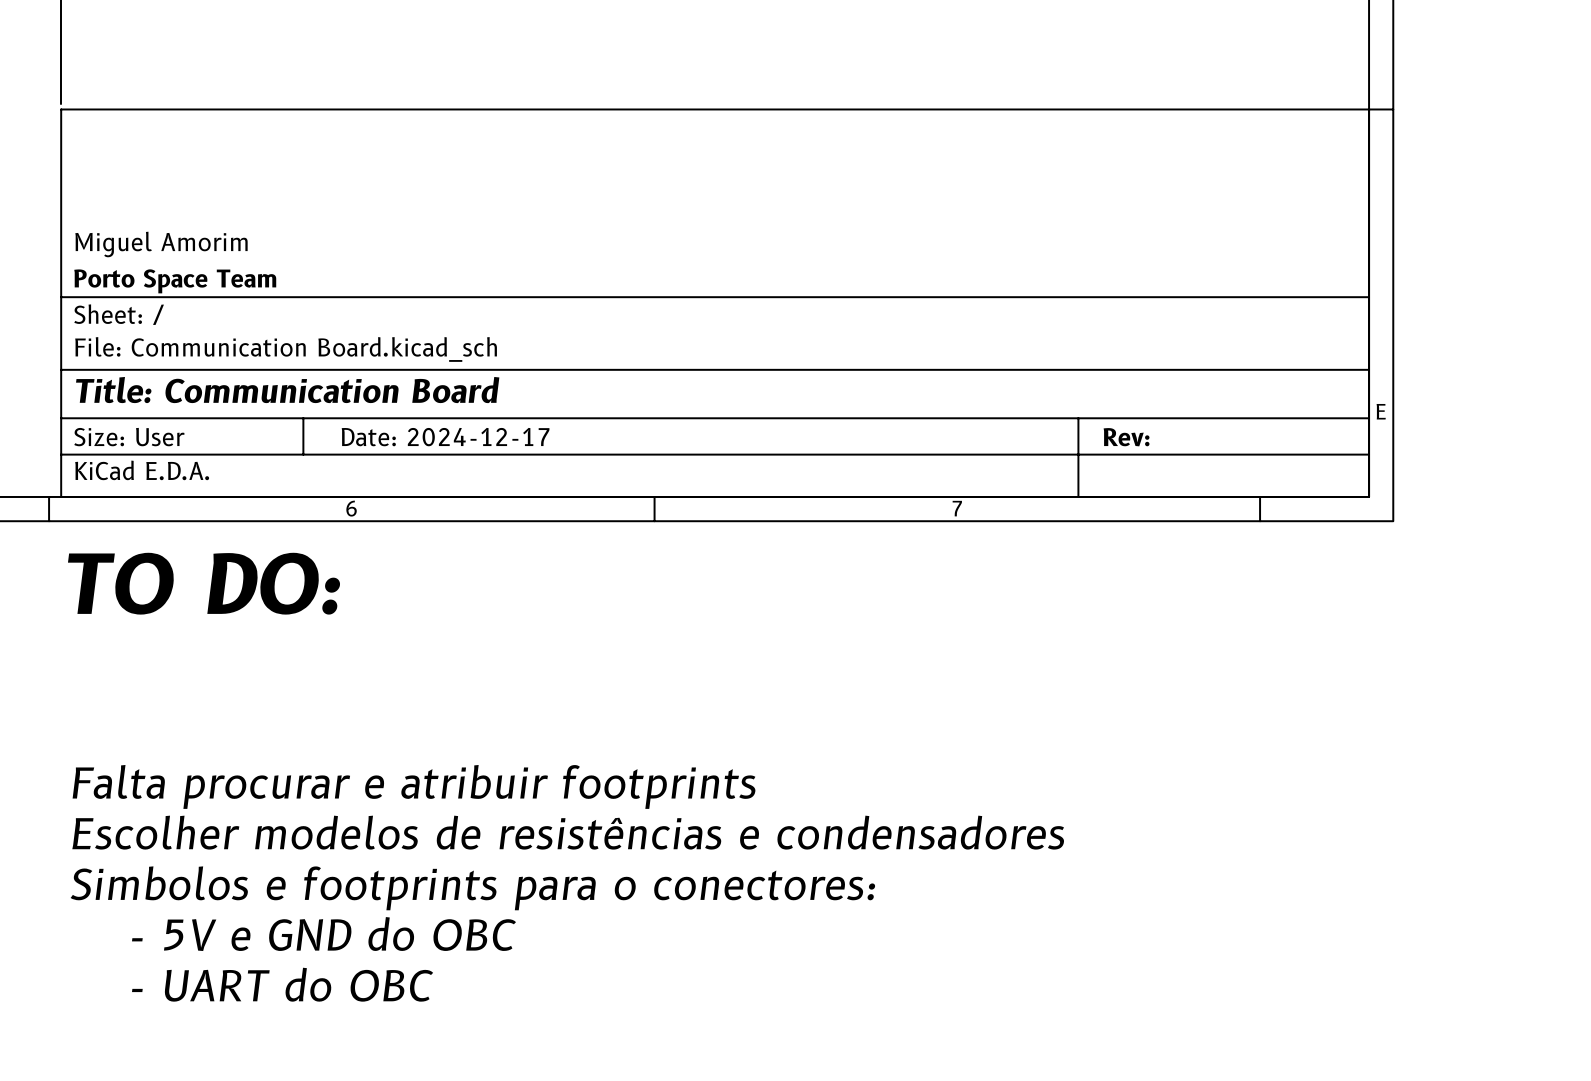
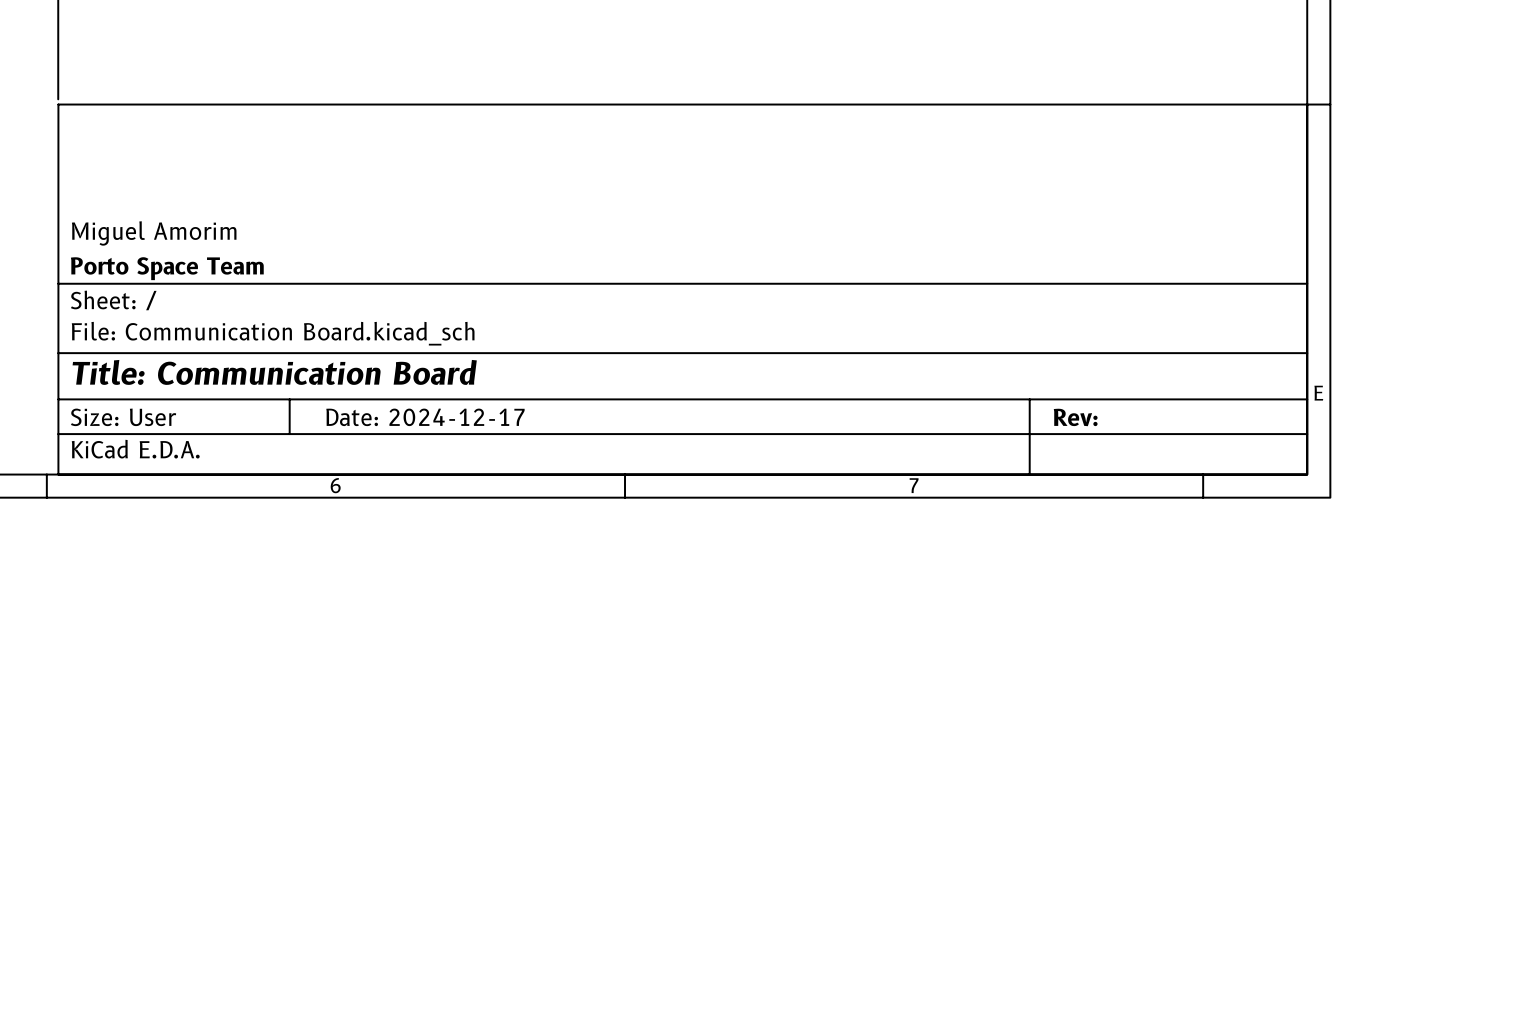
text: TO DO: (204, 583) -> none
text: Falta procurar e atribuir footprints (414, 786) -> none
text: Escolher modelos de resistências e condensadores (568, 832) -> none
text: Simbolos e footprints para o conectores: (472, 888) -> none
text: - 5V e GND do OBC (324, 934) -> none
text: - UART do OBC (282, 984) -> none

